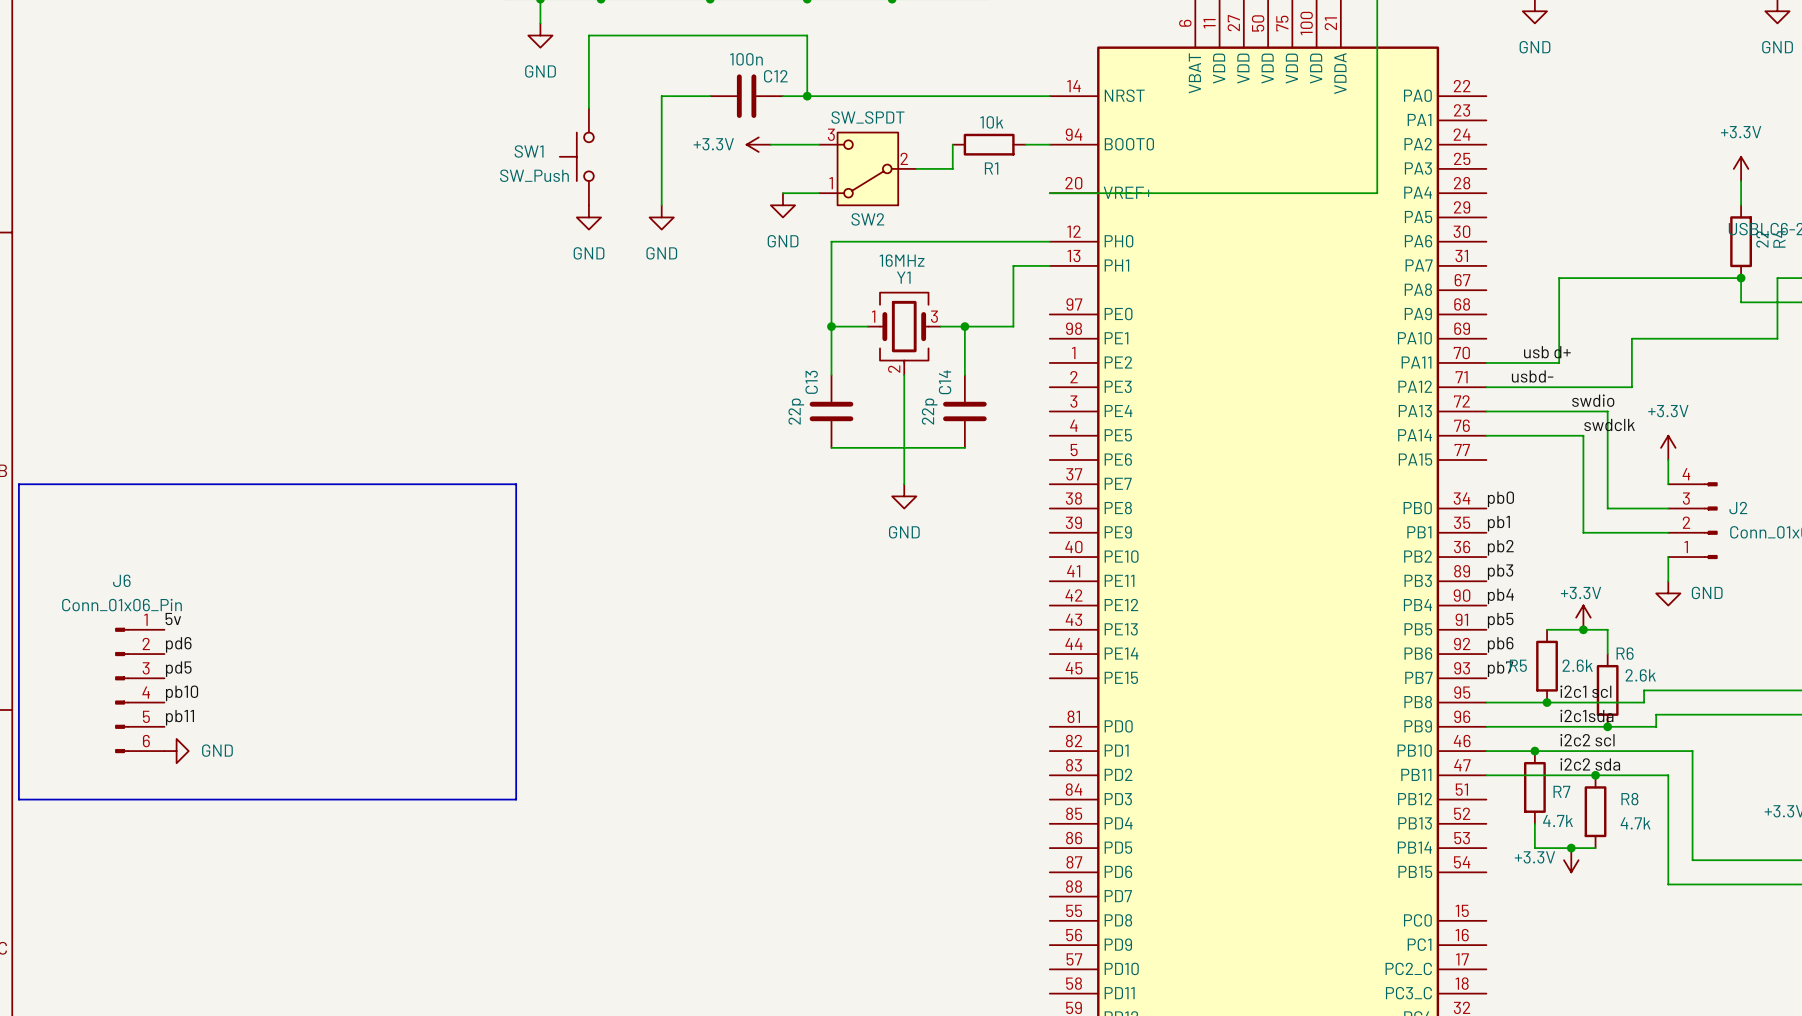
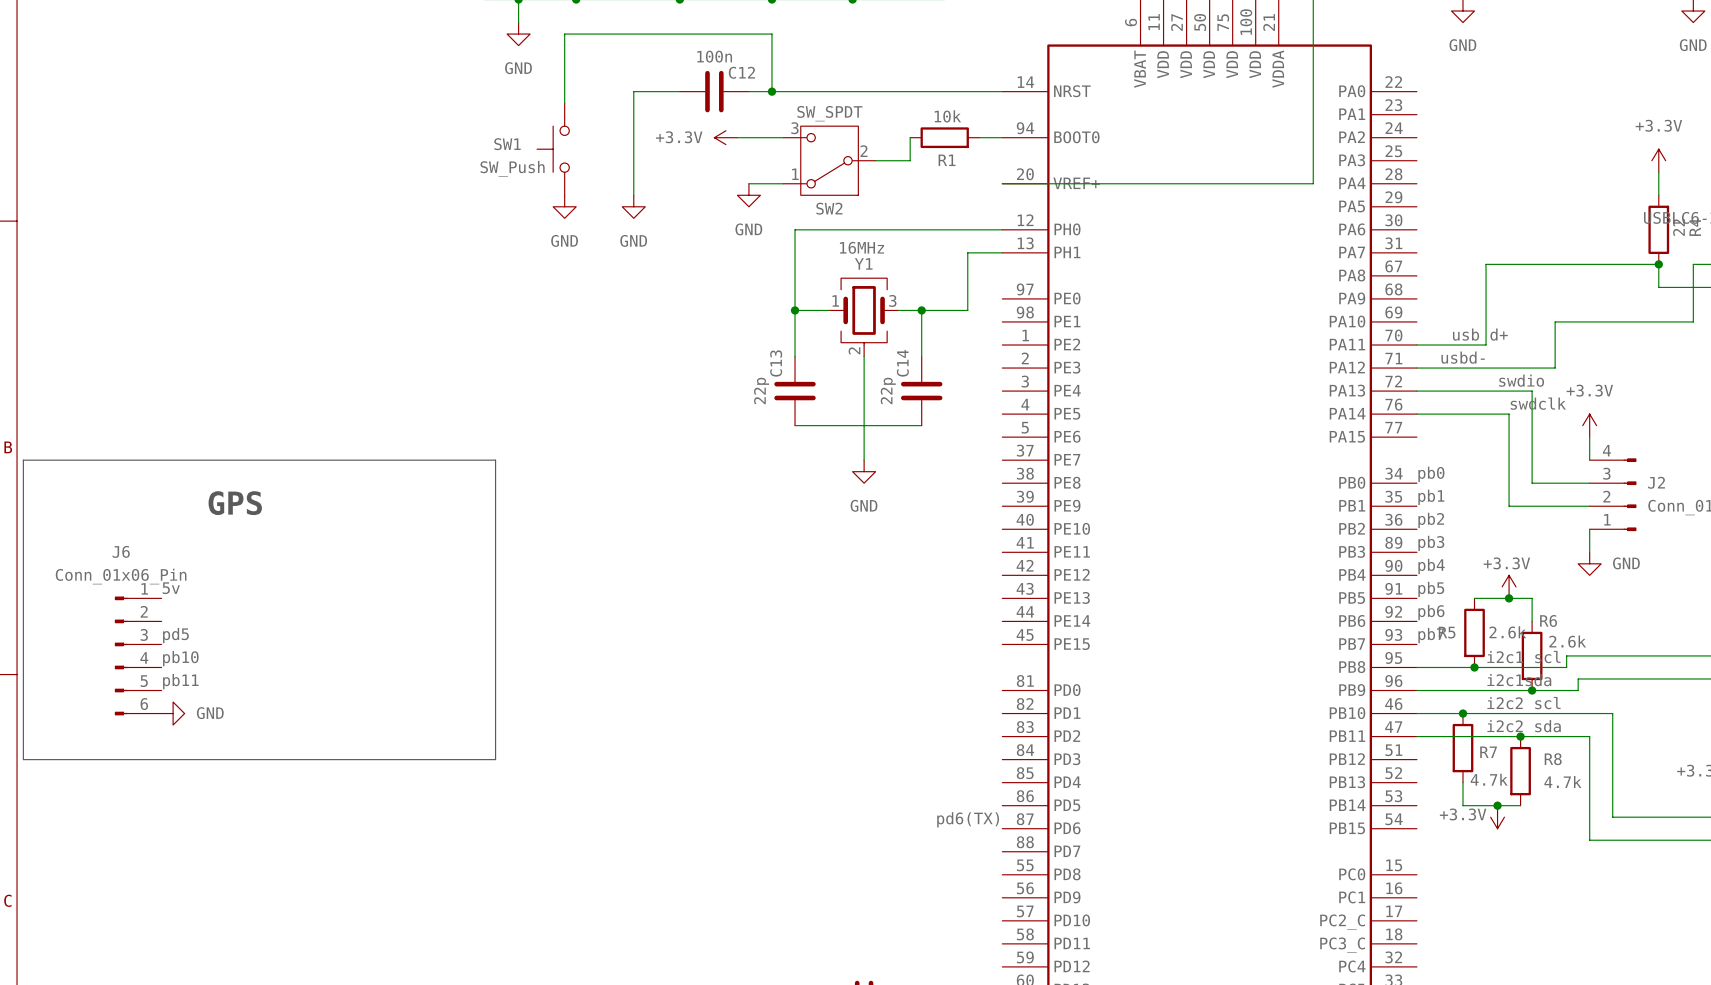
text: none -> GPS (235, 503)
label: pd6 (178, 644) -> none
label: none -> pd6(TX) (968, 819)

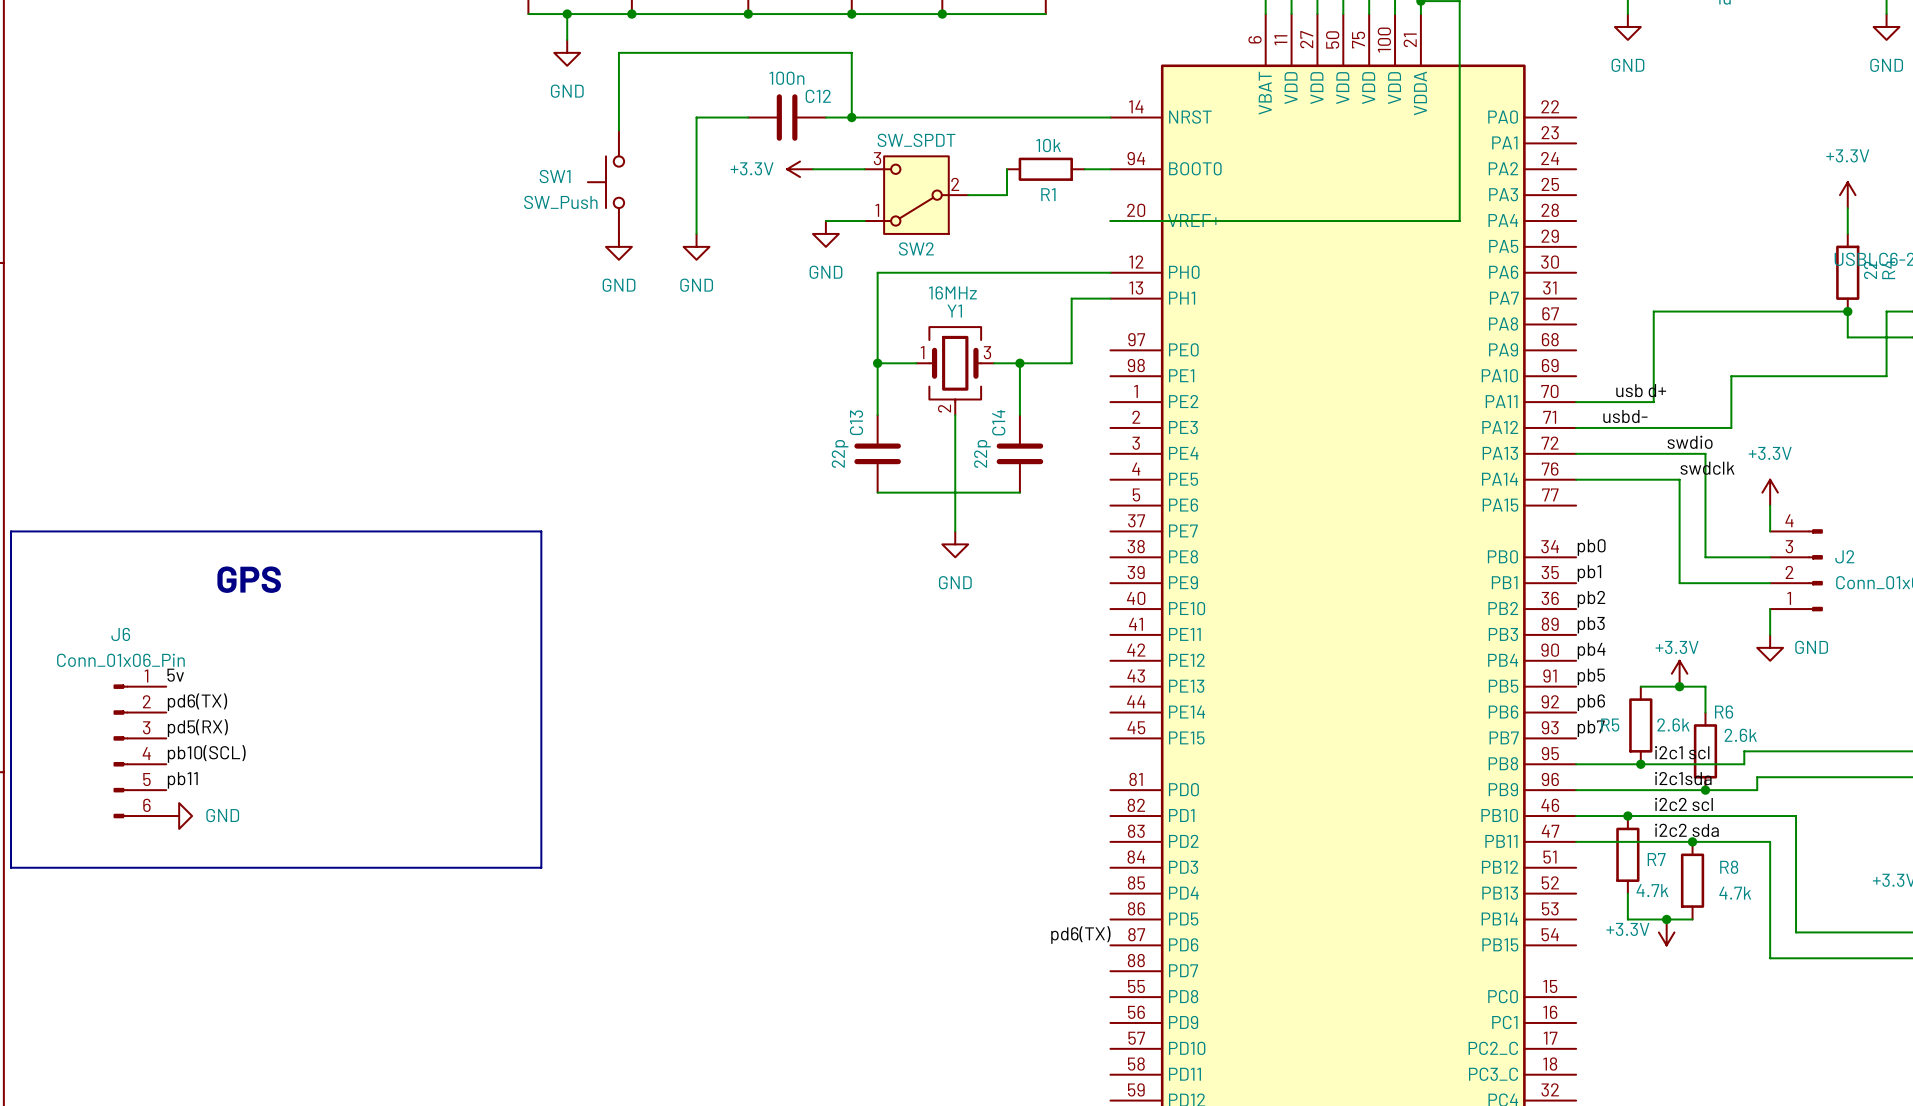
label: none -> pd6(TX) (197, 702)
label: pd5 (175, 635) -> pd5(RX) (197, 728)
label: pb10 (180, 658) -> pb10(SCL) (206, 753)

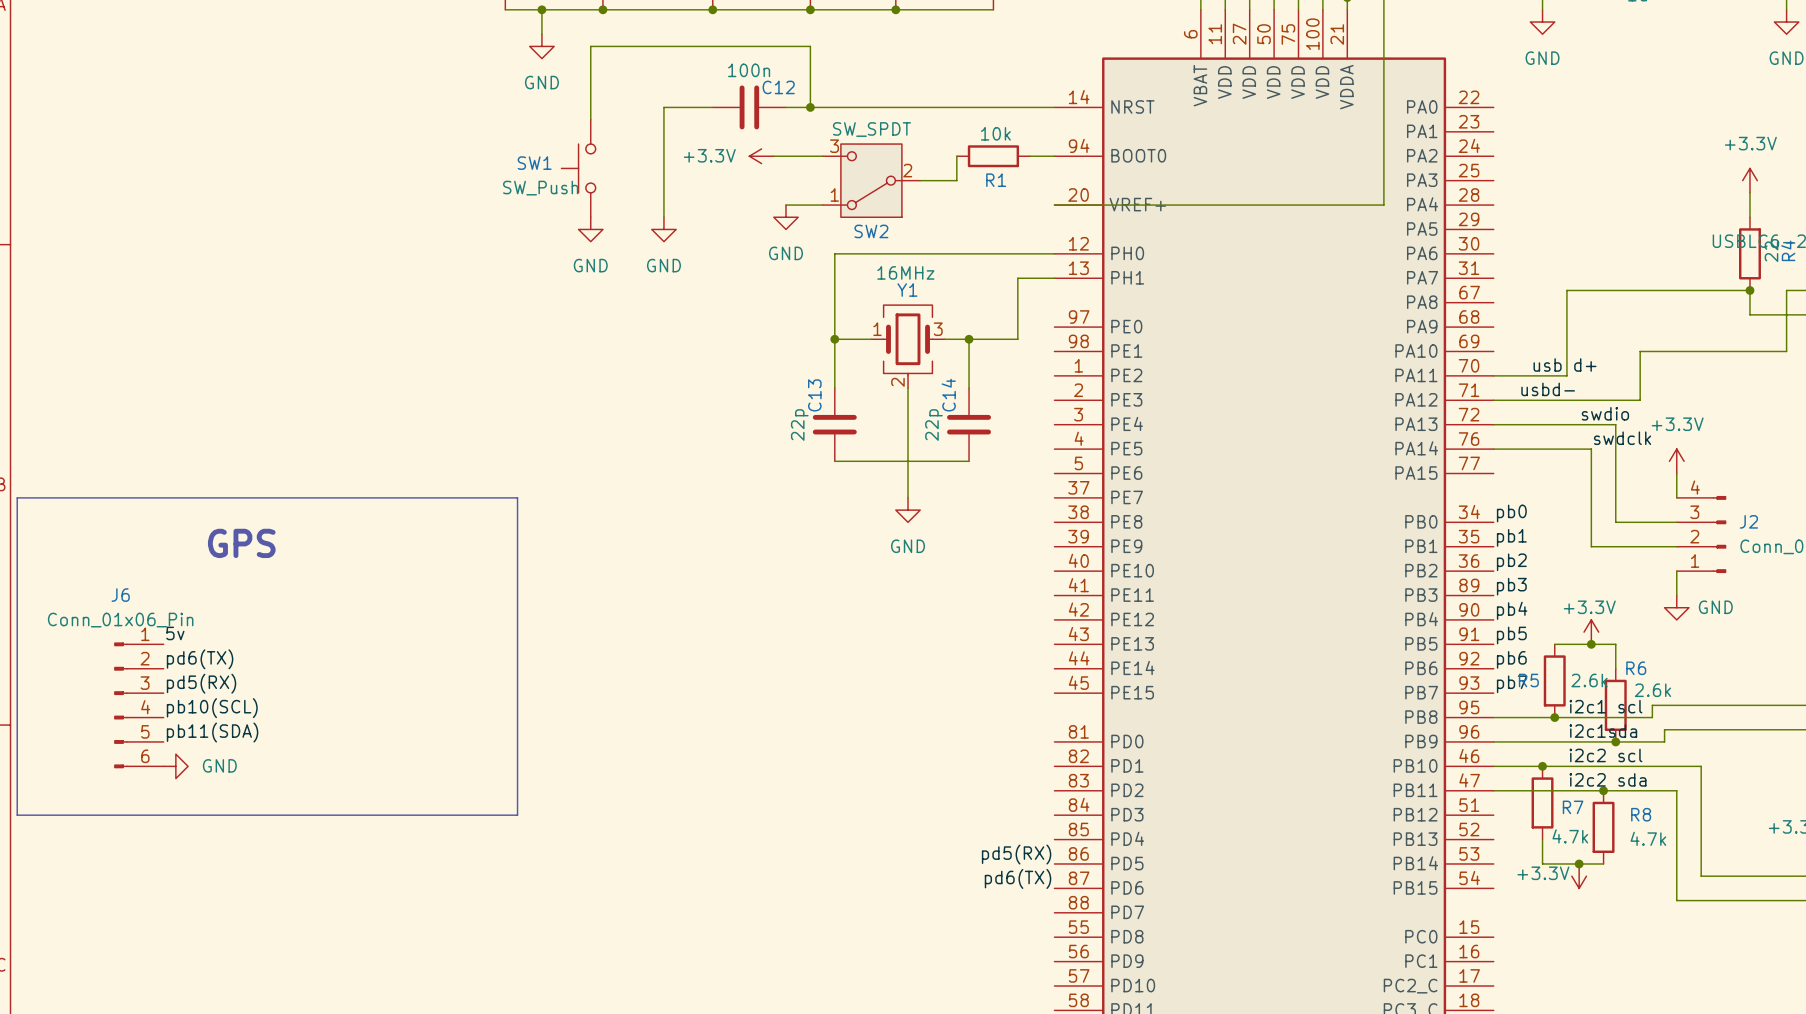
label: pb11 (182, 780) -> pb11(SDA) (212, 732)
label: none -> pd5(RX) (1016, 854)

